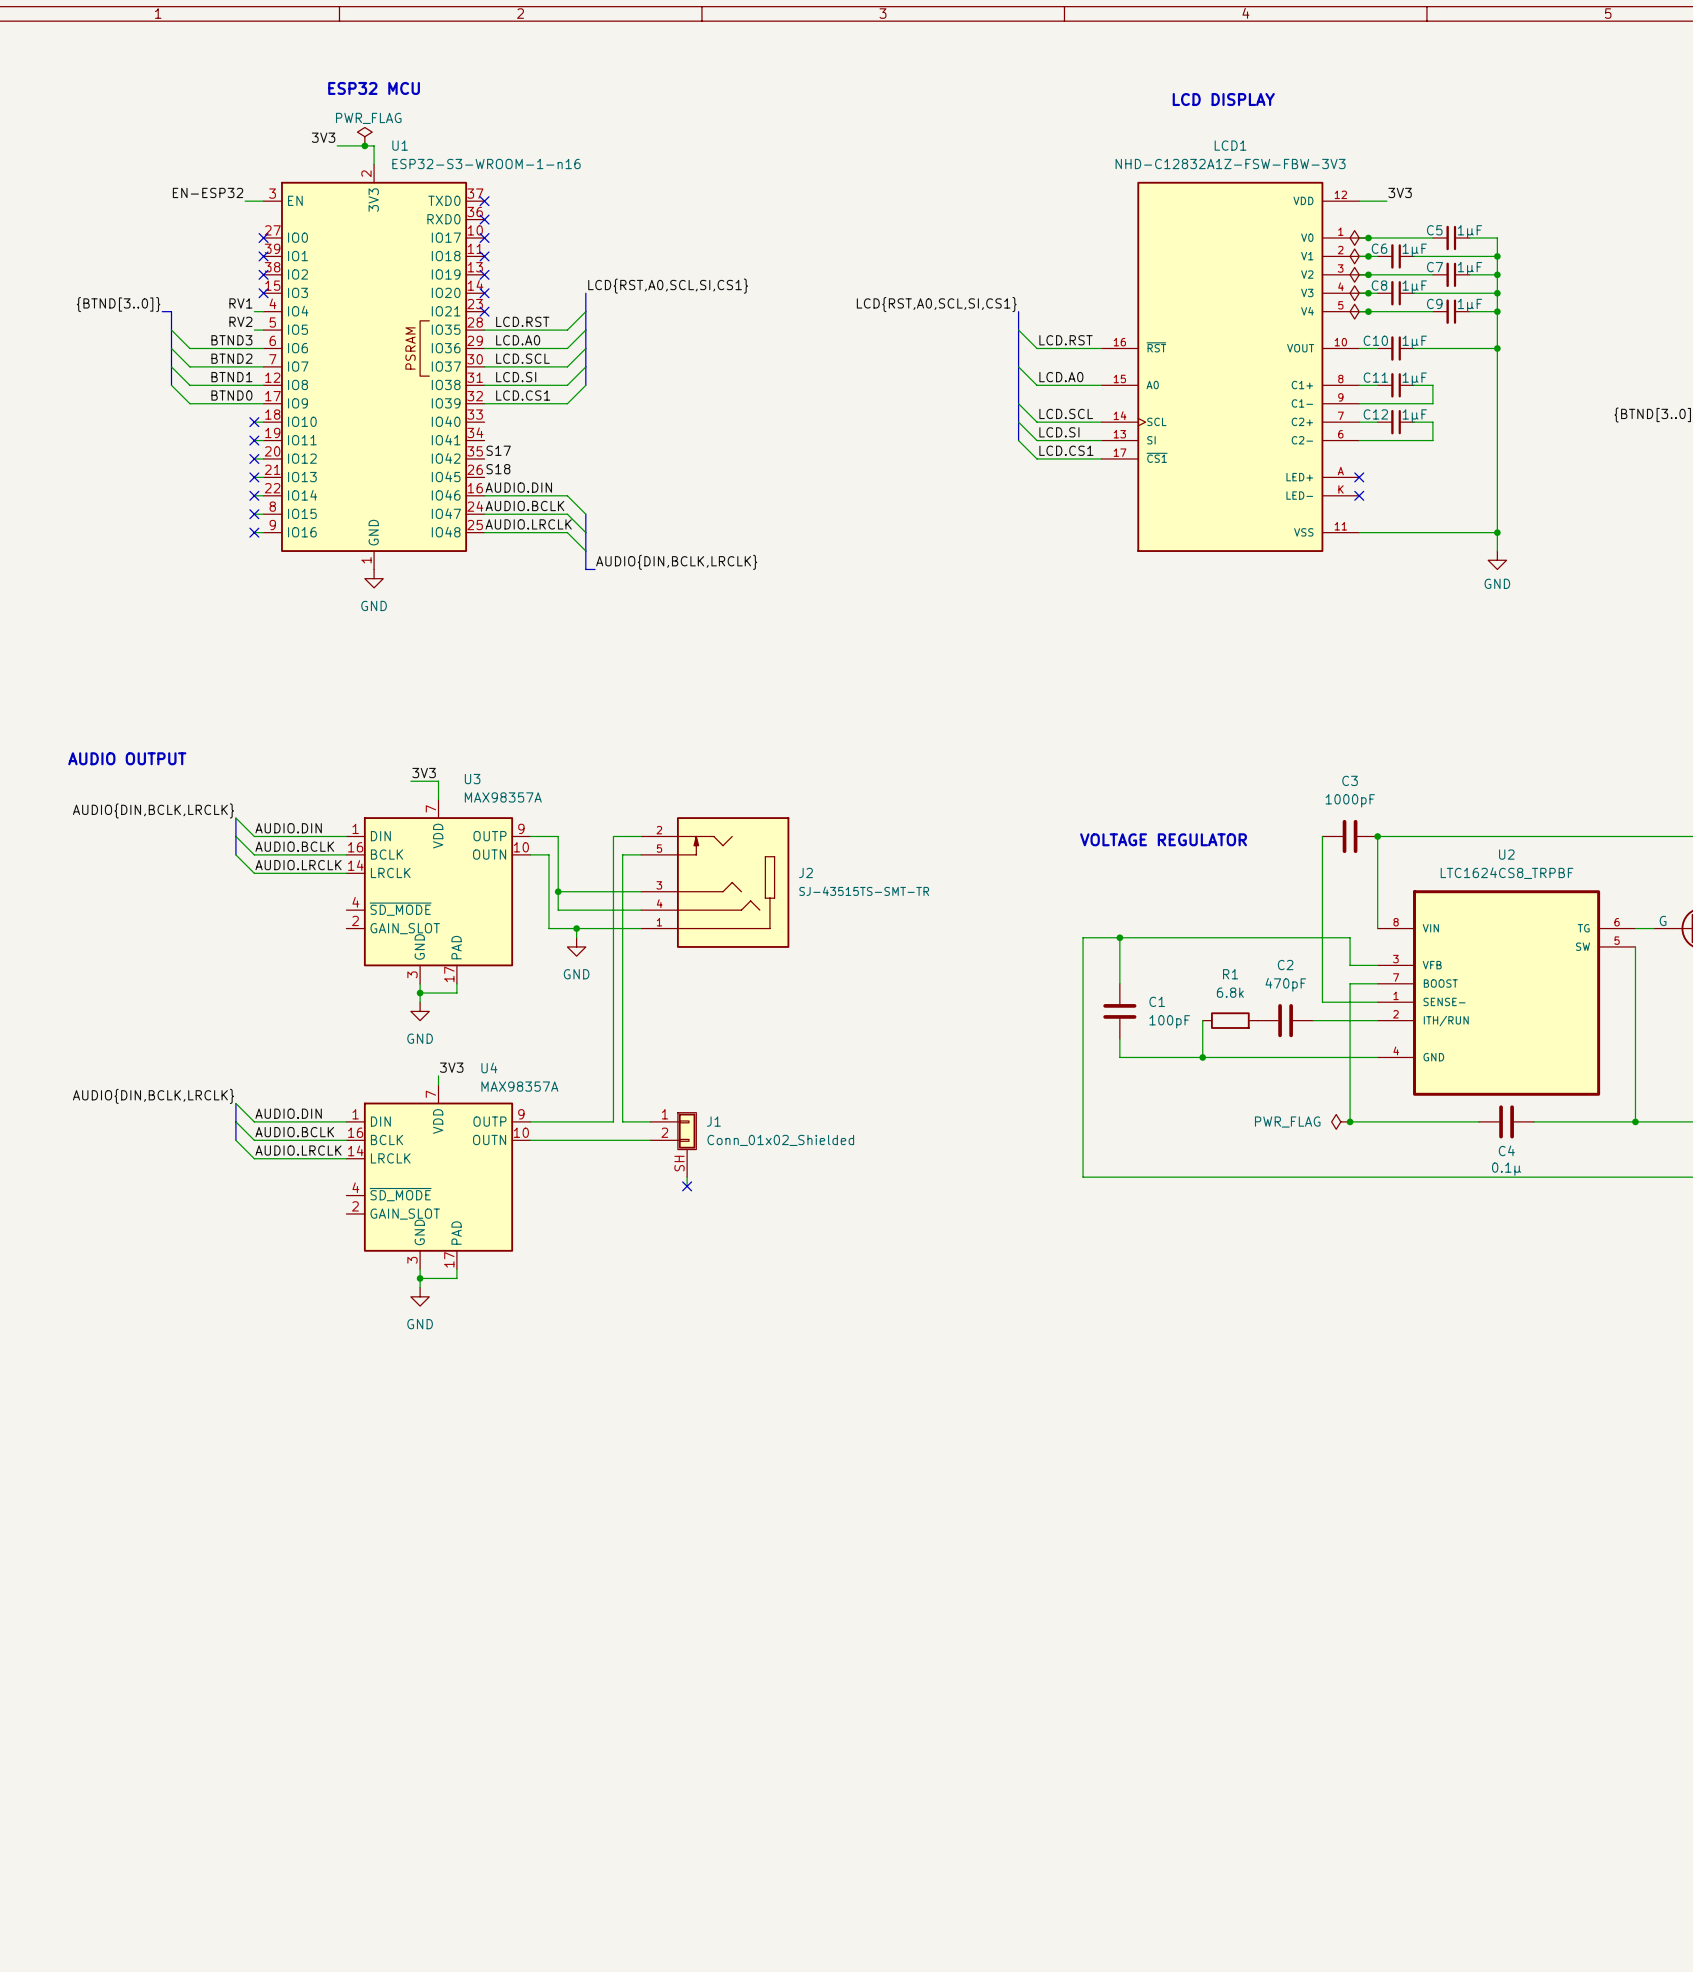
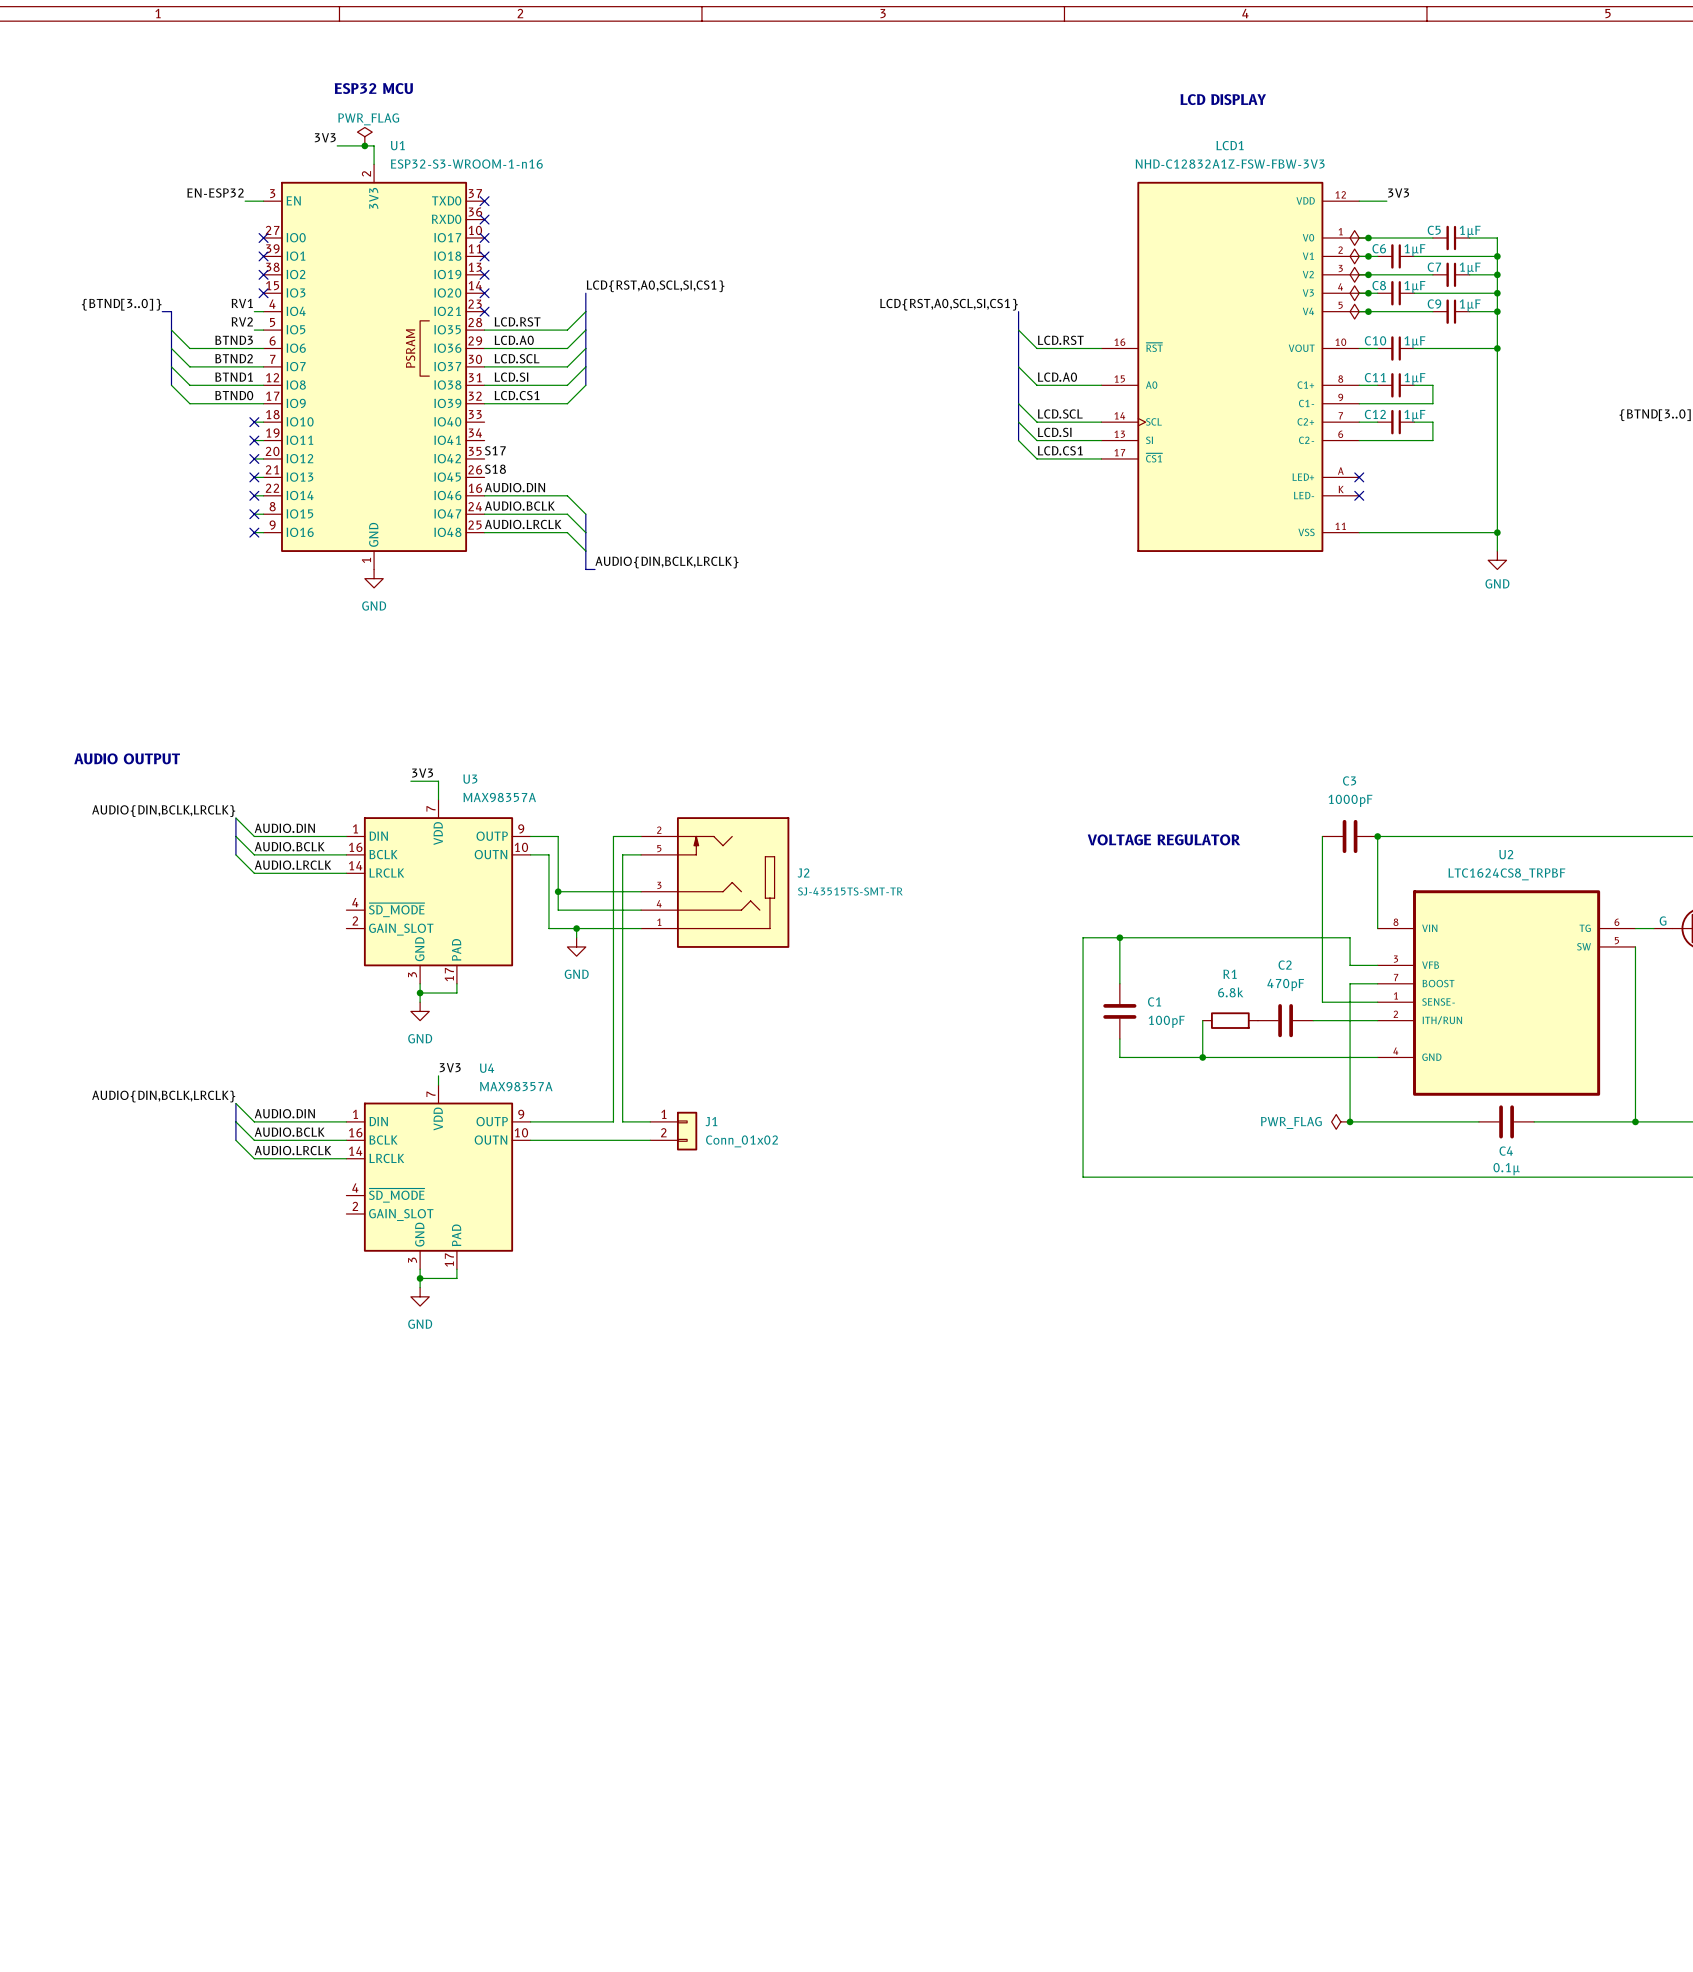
J1 symbol: [650, 1112, 697, 1178] -> [650, 1111, 698, 1151]
J1 value: Conn_01x02_Shielded (780, 1140) -> Conn_01x02 (742, 1141)
wire: (687, 1177) (687, 1186) -> none
no-connect mark: (687, 1186) -> none

